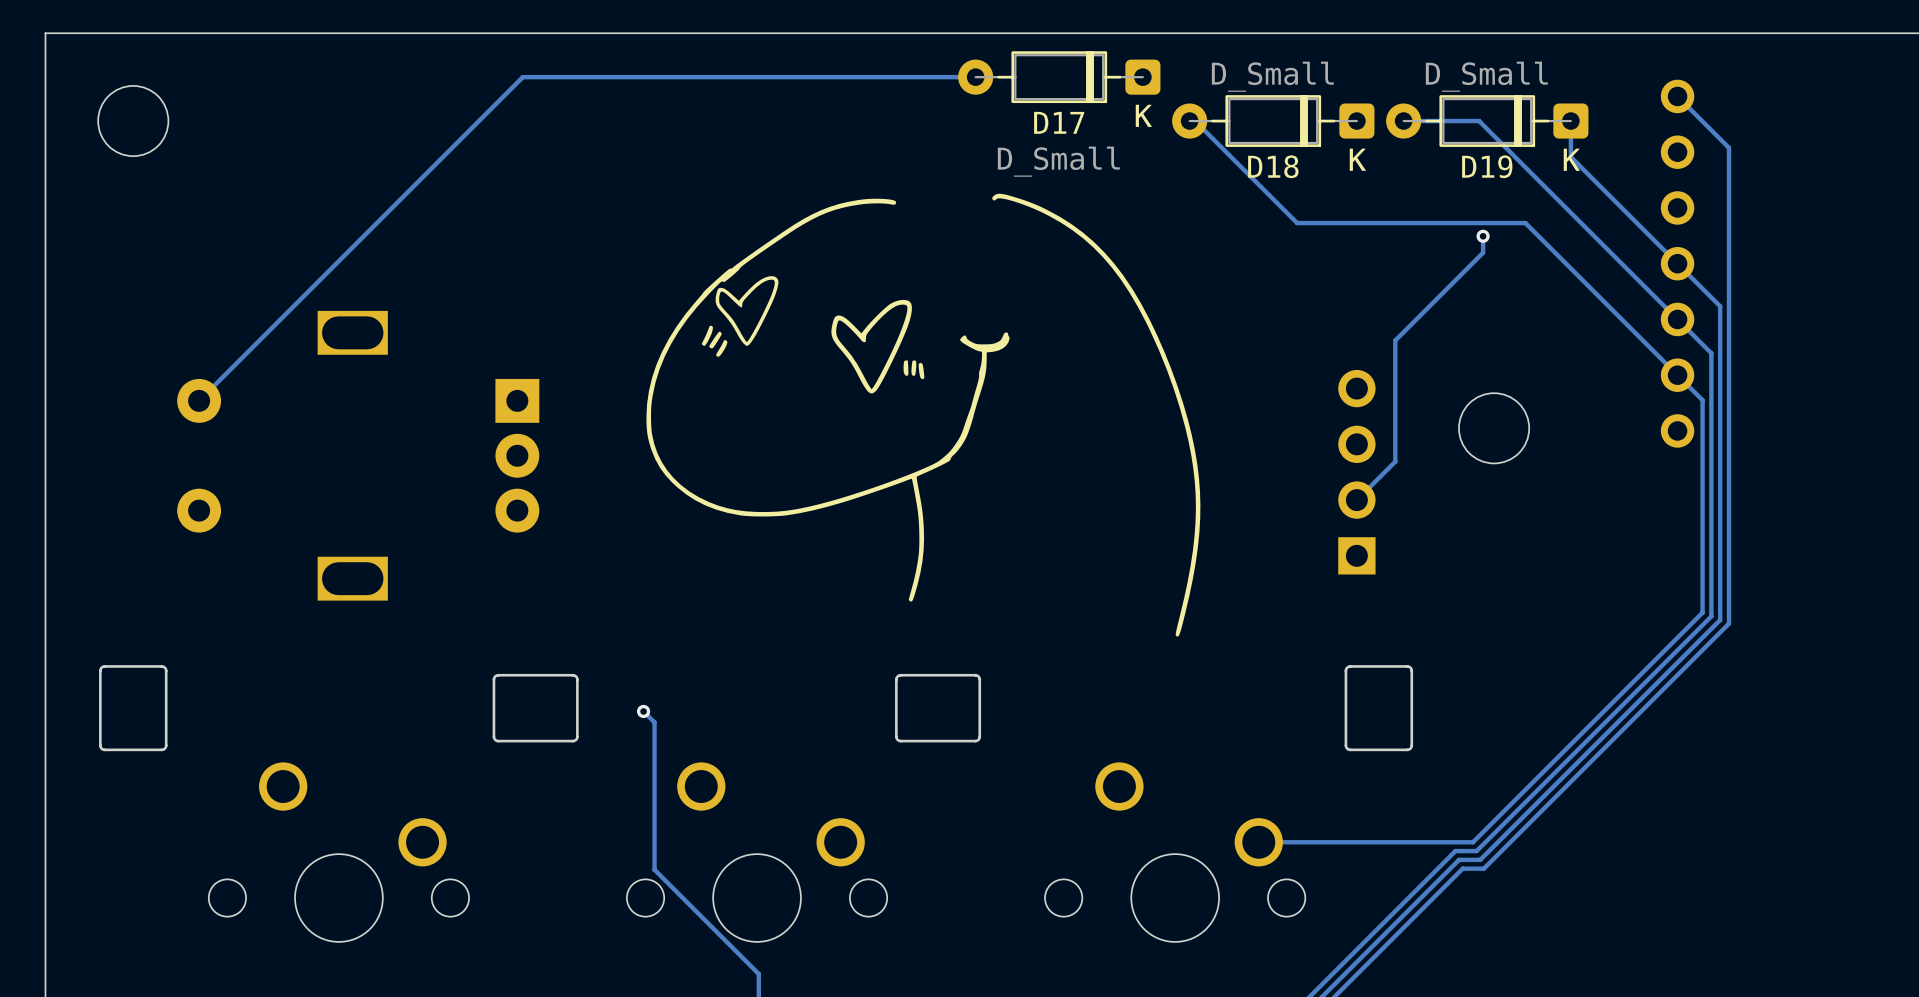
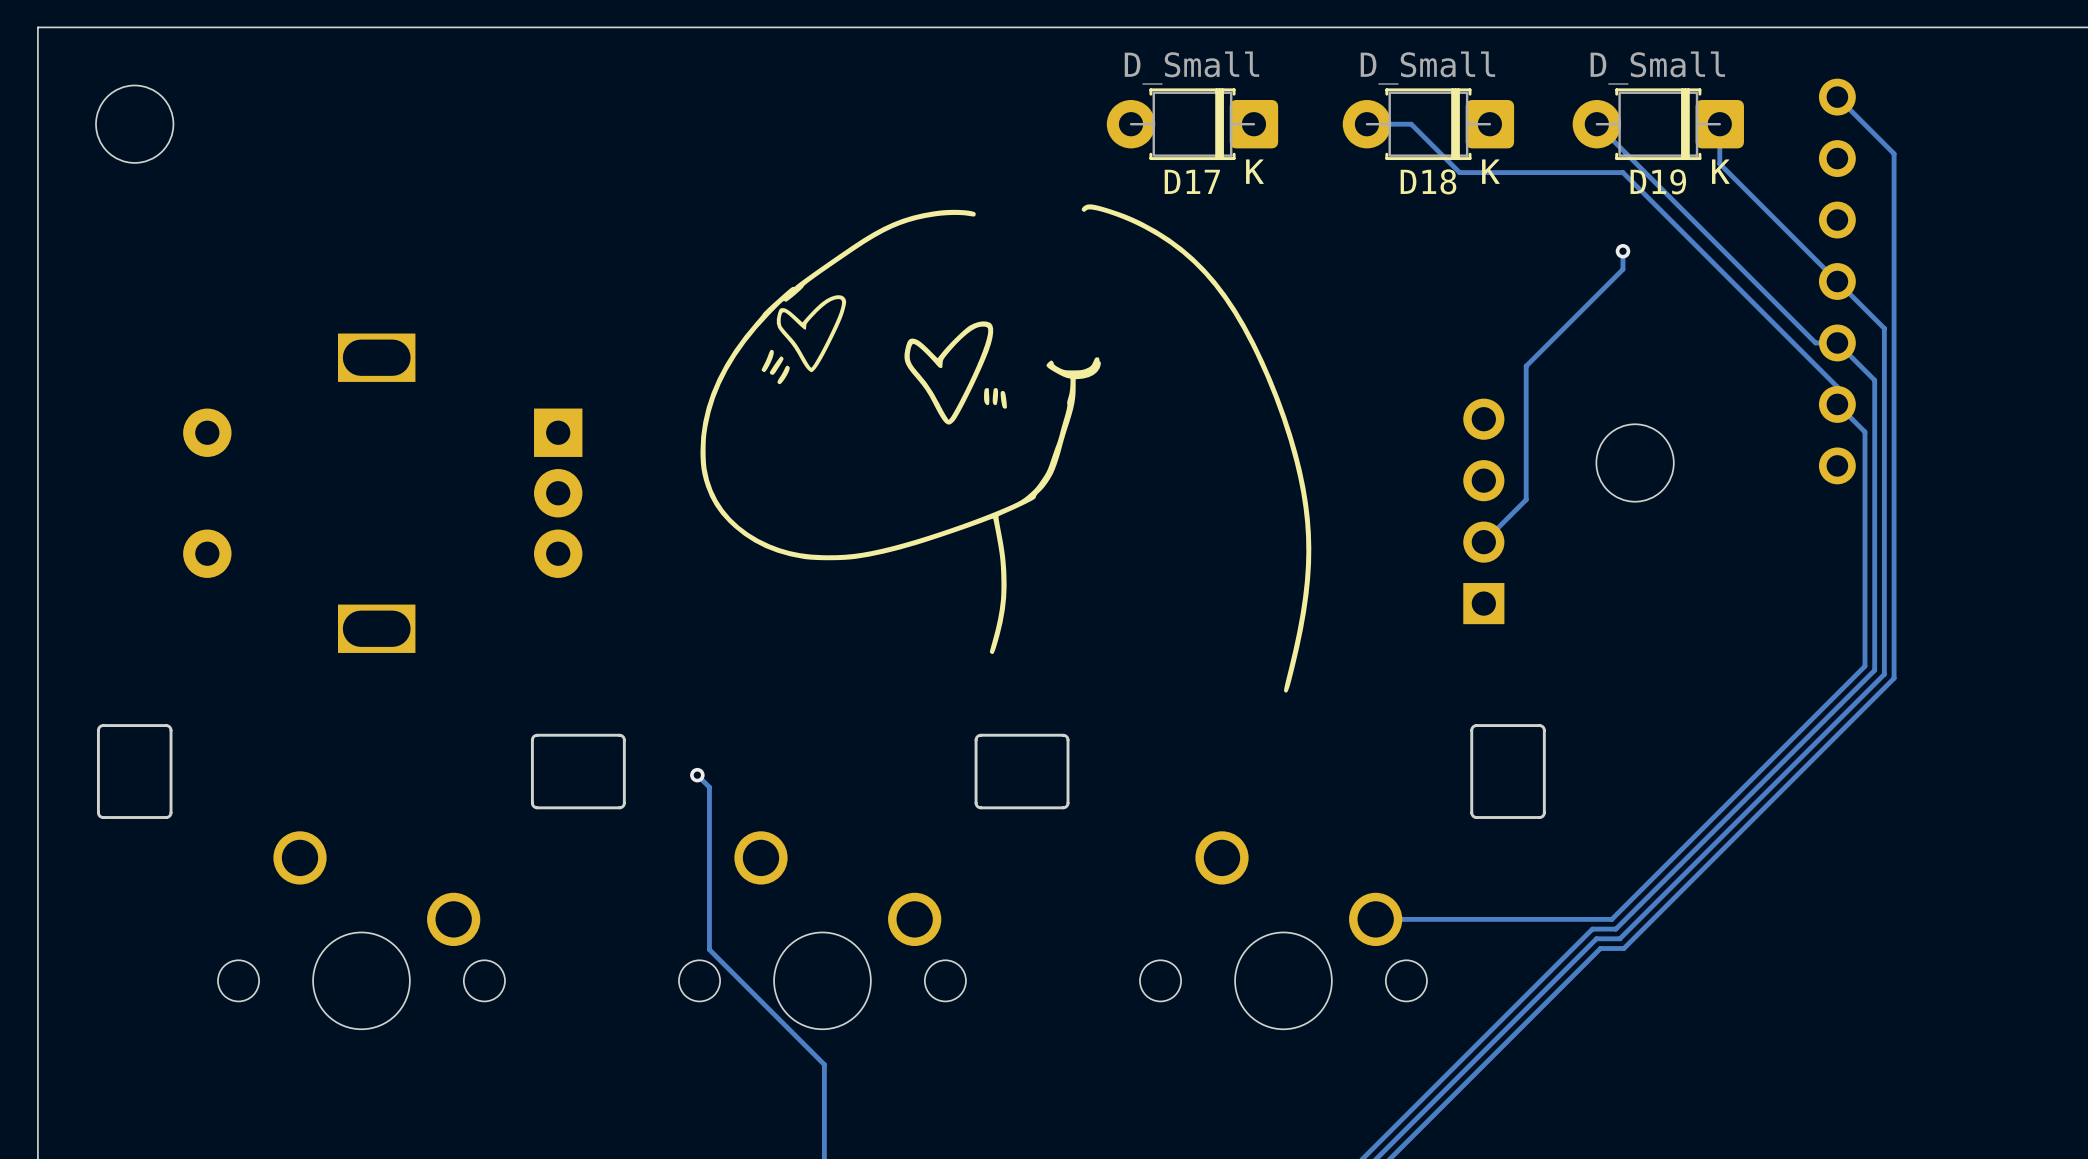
D17 footprint: [958, 51, 1161, 104] -> [1106, 88, 1279, 161]
track: (975, 77) (522, 77) (199, 400) -> none
D18 footprint: [1172, 95, 1375, 147] -> [1342, 88, 1515, 161]
D19 footprint: [1386, 95, 1589, 147] -> [1572, 88, 1744, 161]
track: (1189, 121) (1195, 121) (1297, 223) (1525, 223) (1677, 375) -> (1366, 124) (1411, 124) (1459, 172) (1622, 172) (1837, 387) (1837, 404)
track: (1403, 121) (1479, 121) (1677, 319) -> (1596, 124) (1815, 342) (1837, 342)
D17 value position: D_Small (1058, 161) -> D_Small (1191, 68)

